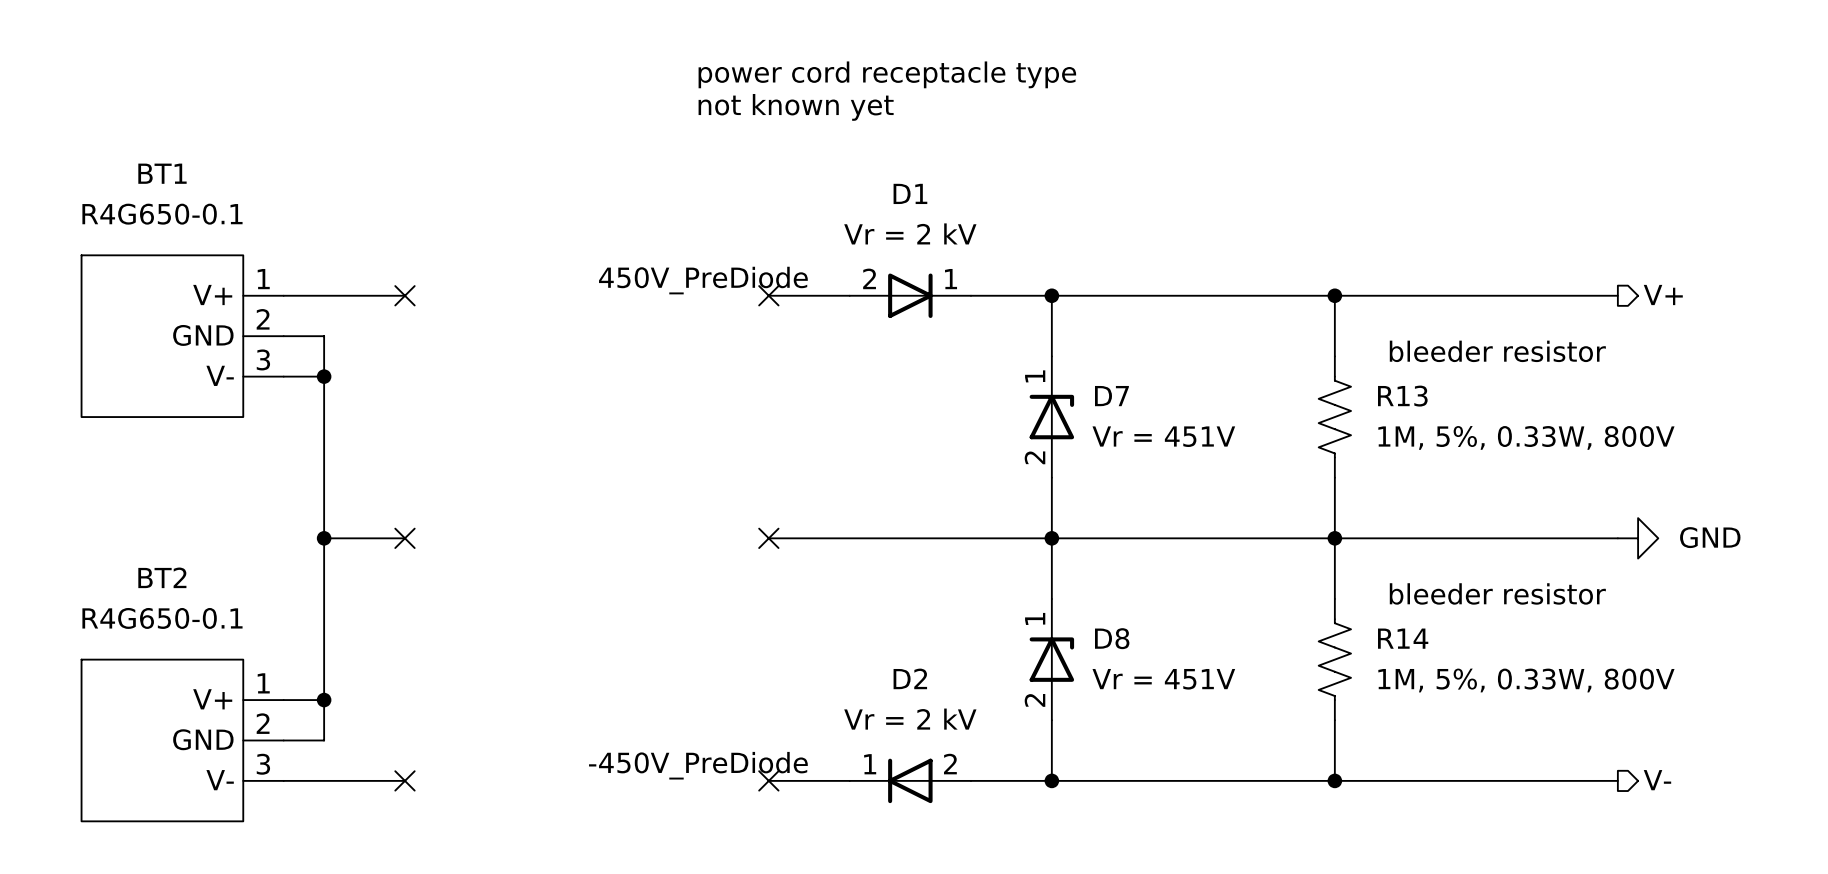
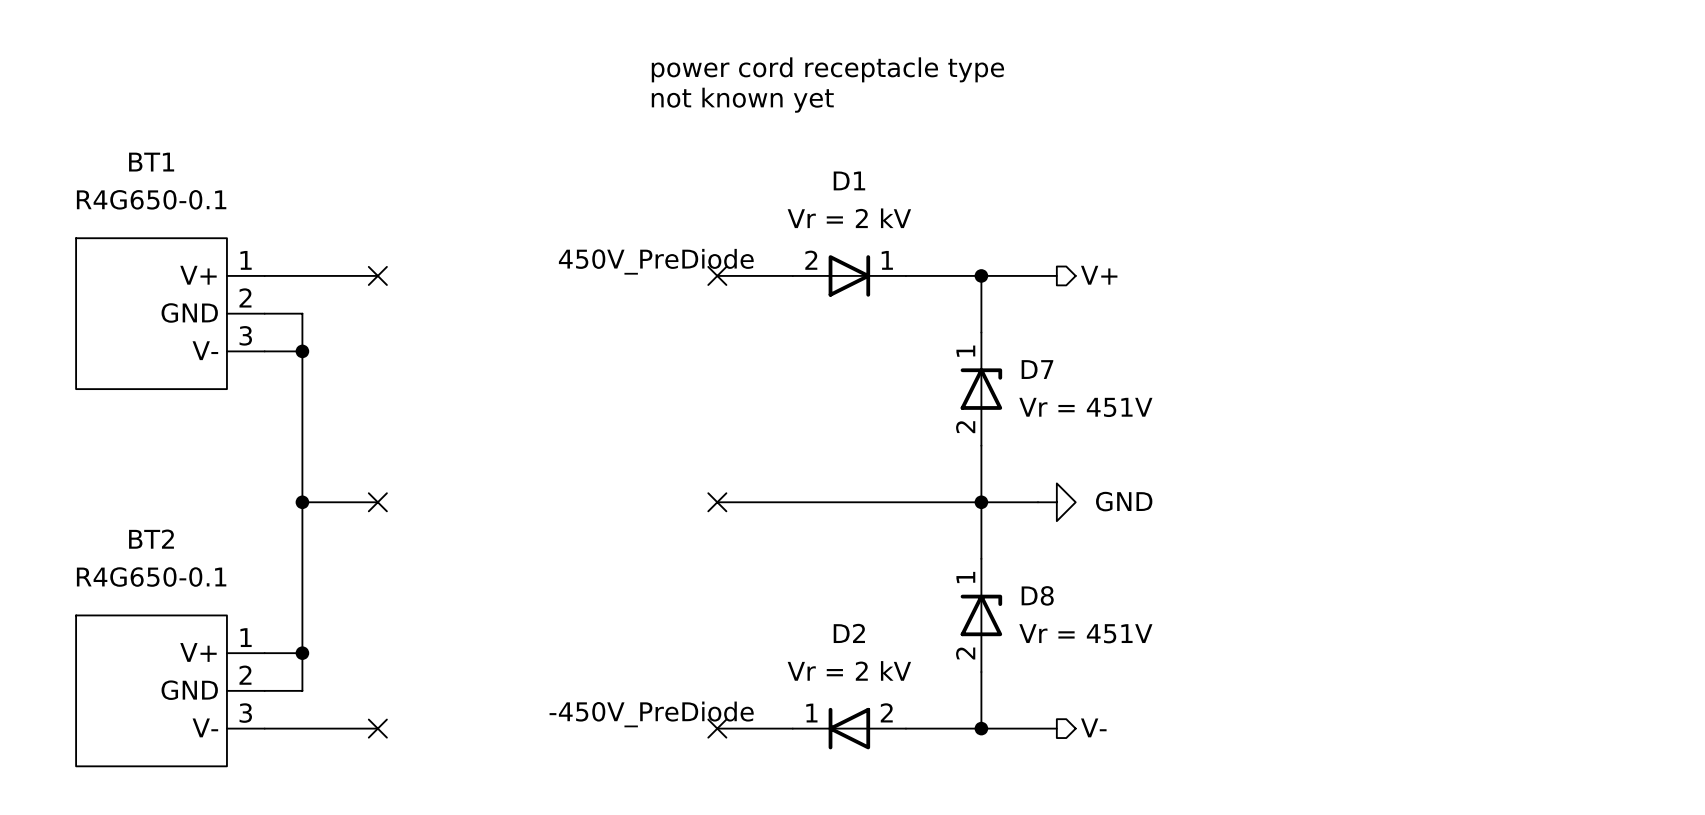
wire: (1132, 295) (1617, 295) -> none
hierarchical label: none -> V+ (1099, 275)
wire: (1334, 295) (1334, 356) -> none
junction: (1334, 295) -> none
hierarchical label: V+ (1663, 295) -> none
R13: 1M, 5%, 0.33W, 800V (1334, 417) -> none
wire: (1334, 477) (1334, 598) -> none
wire: (1112, 538) (1617, 538) -> none
power symbol: none -> GND (1056, 502)
junction: (1334, 538) -> none
power symbol: GND (1638, 538) -> none
R14: 1M, 5%, 0.33W, 800V (1334, 659) -> none
wire: (1334, 720) (1334, 780) -> none
wire: (1132, 780) (1617, 780) -> none
hierarchical label: none -> V- (1093, 727)
junction: (1334, 780) -> none
hierarchical label: V- (1657, 780) -> none

